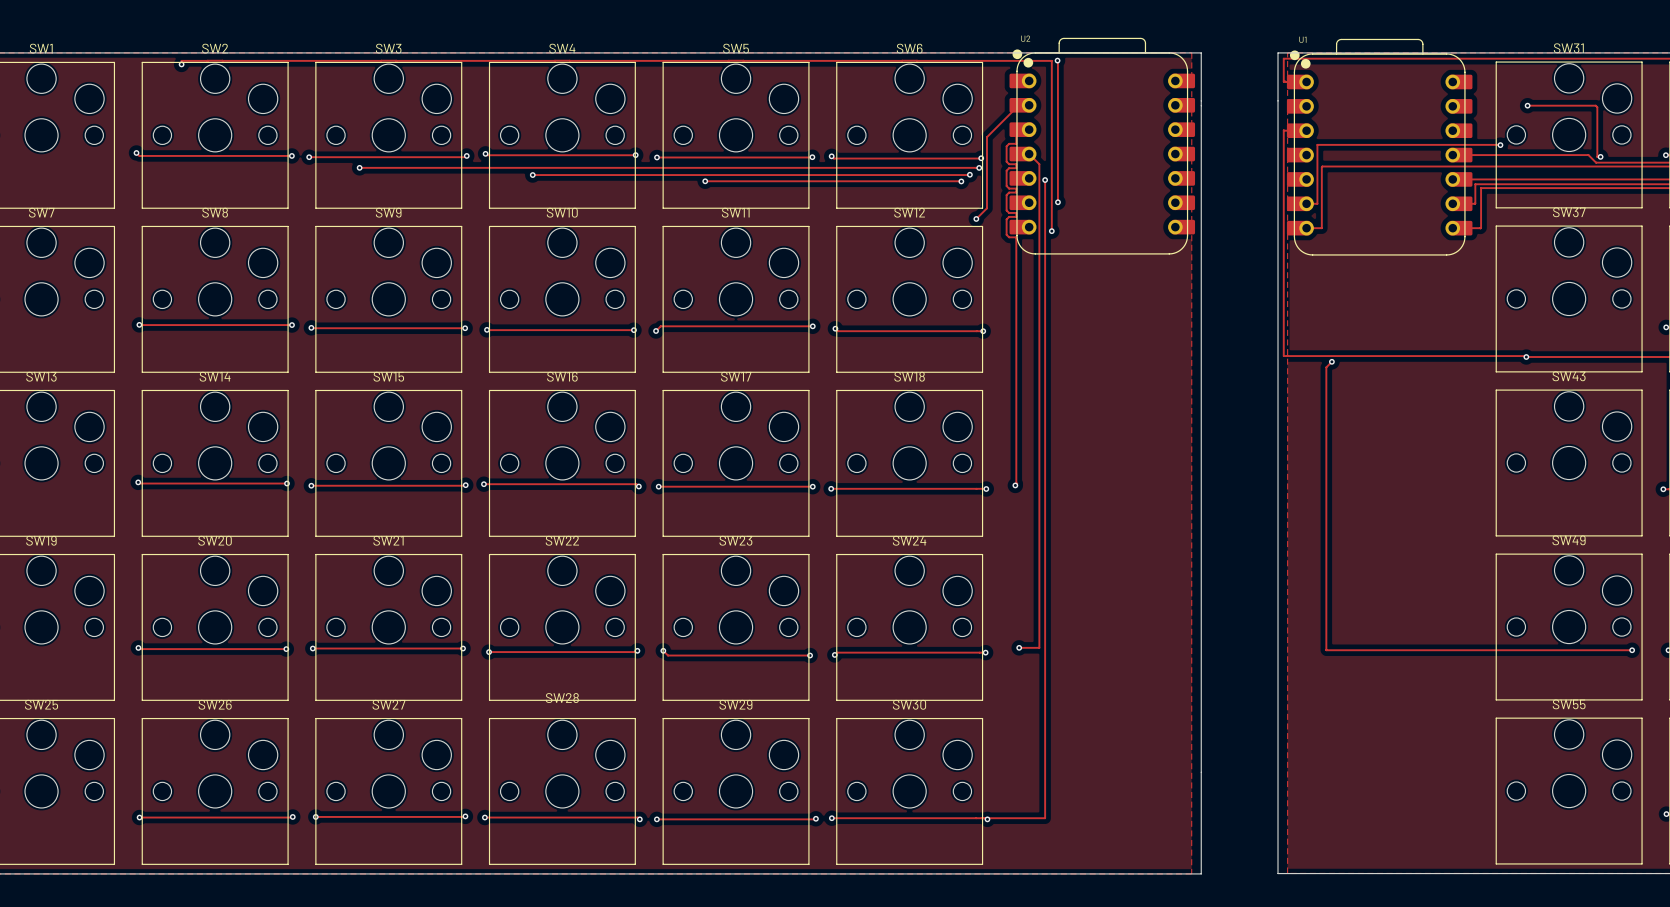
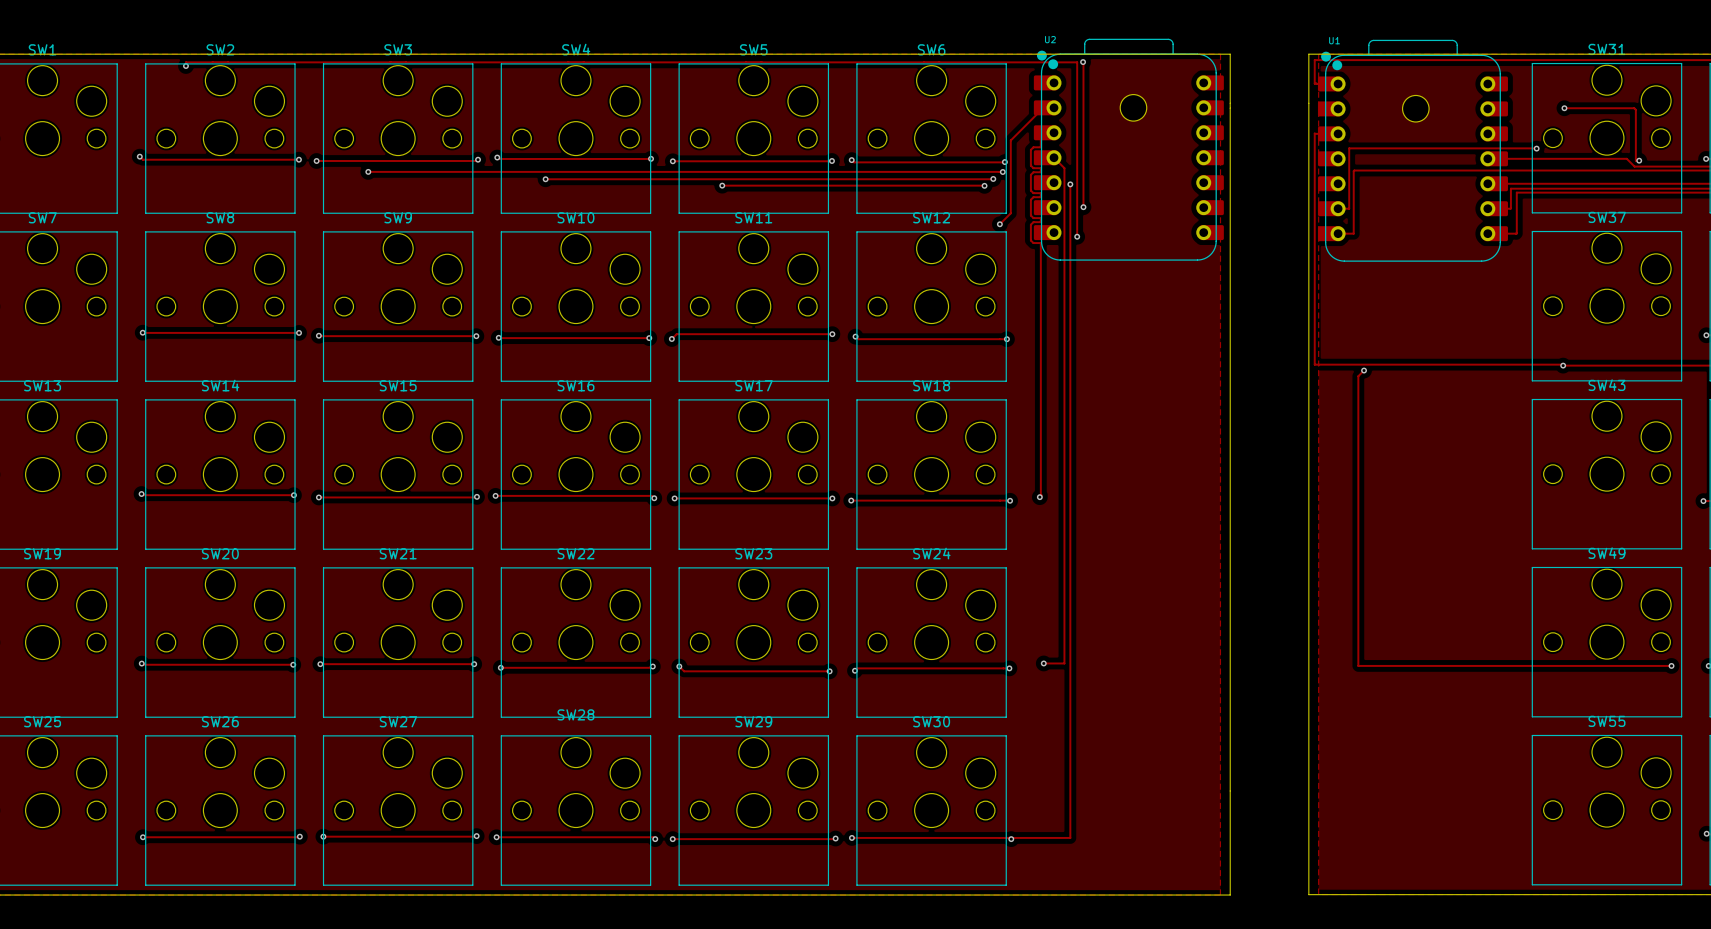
part: none -> (1133, 107)
part: none -> (1415, 108)

